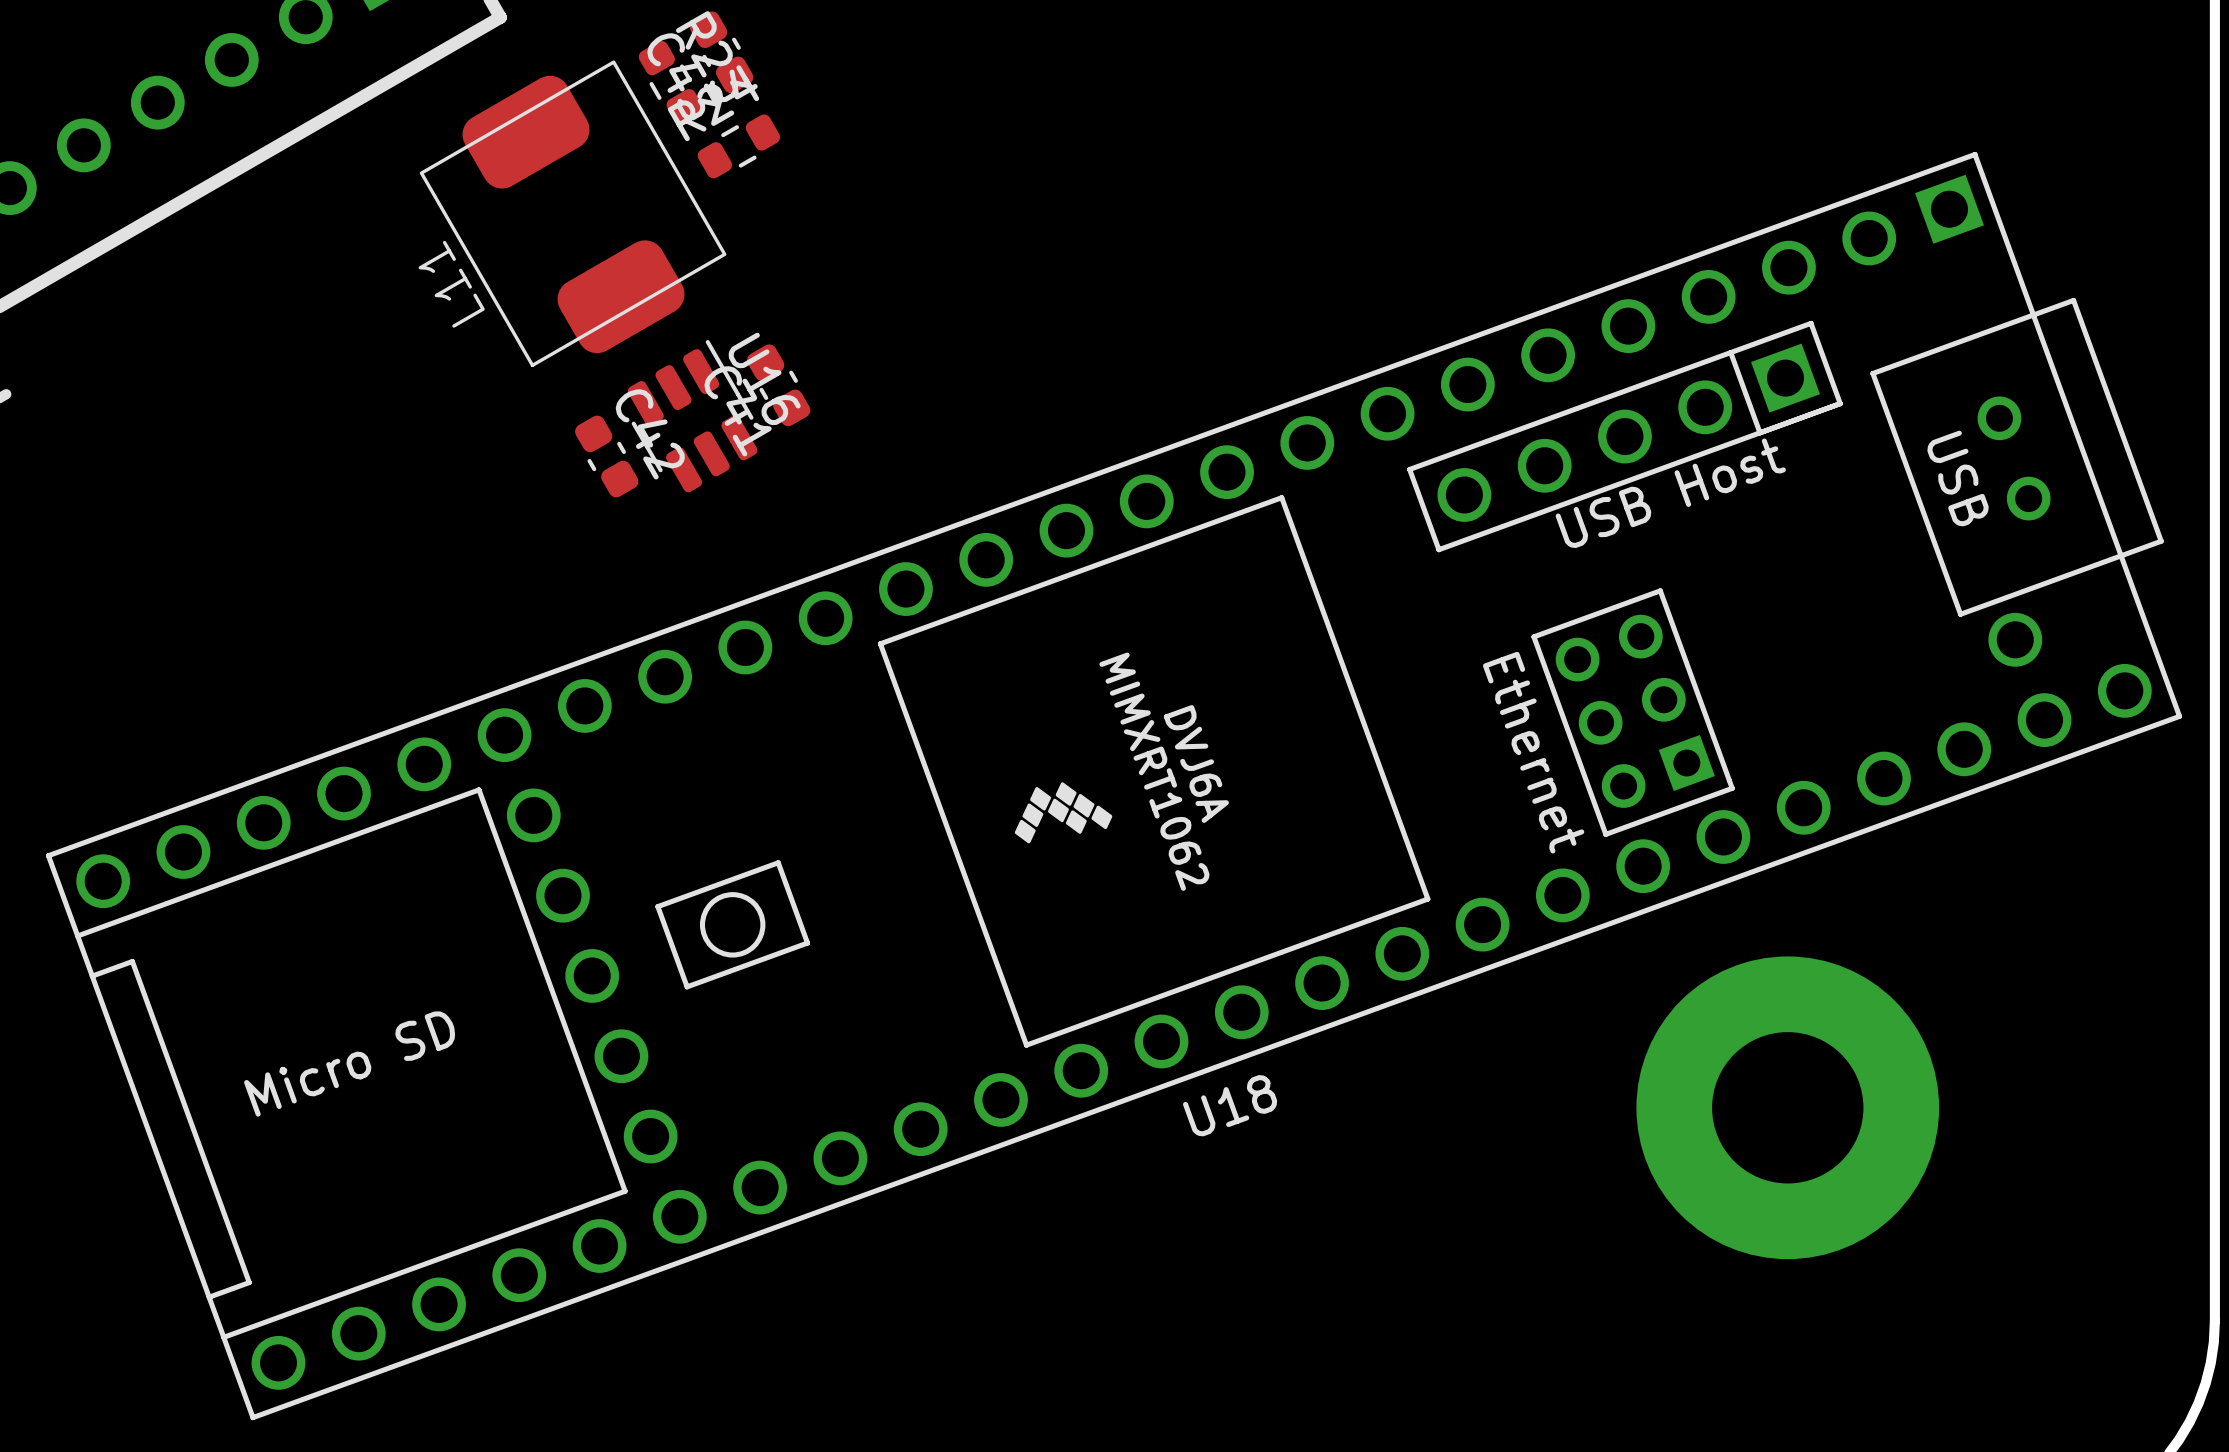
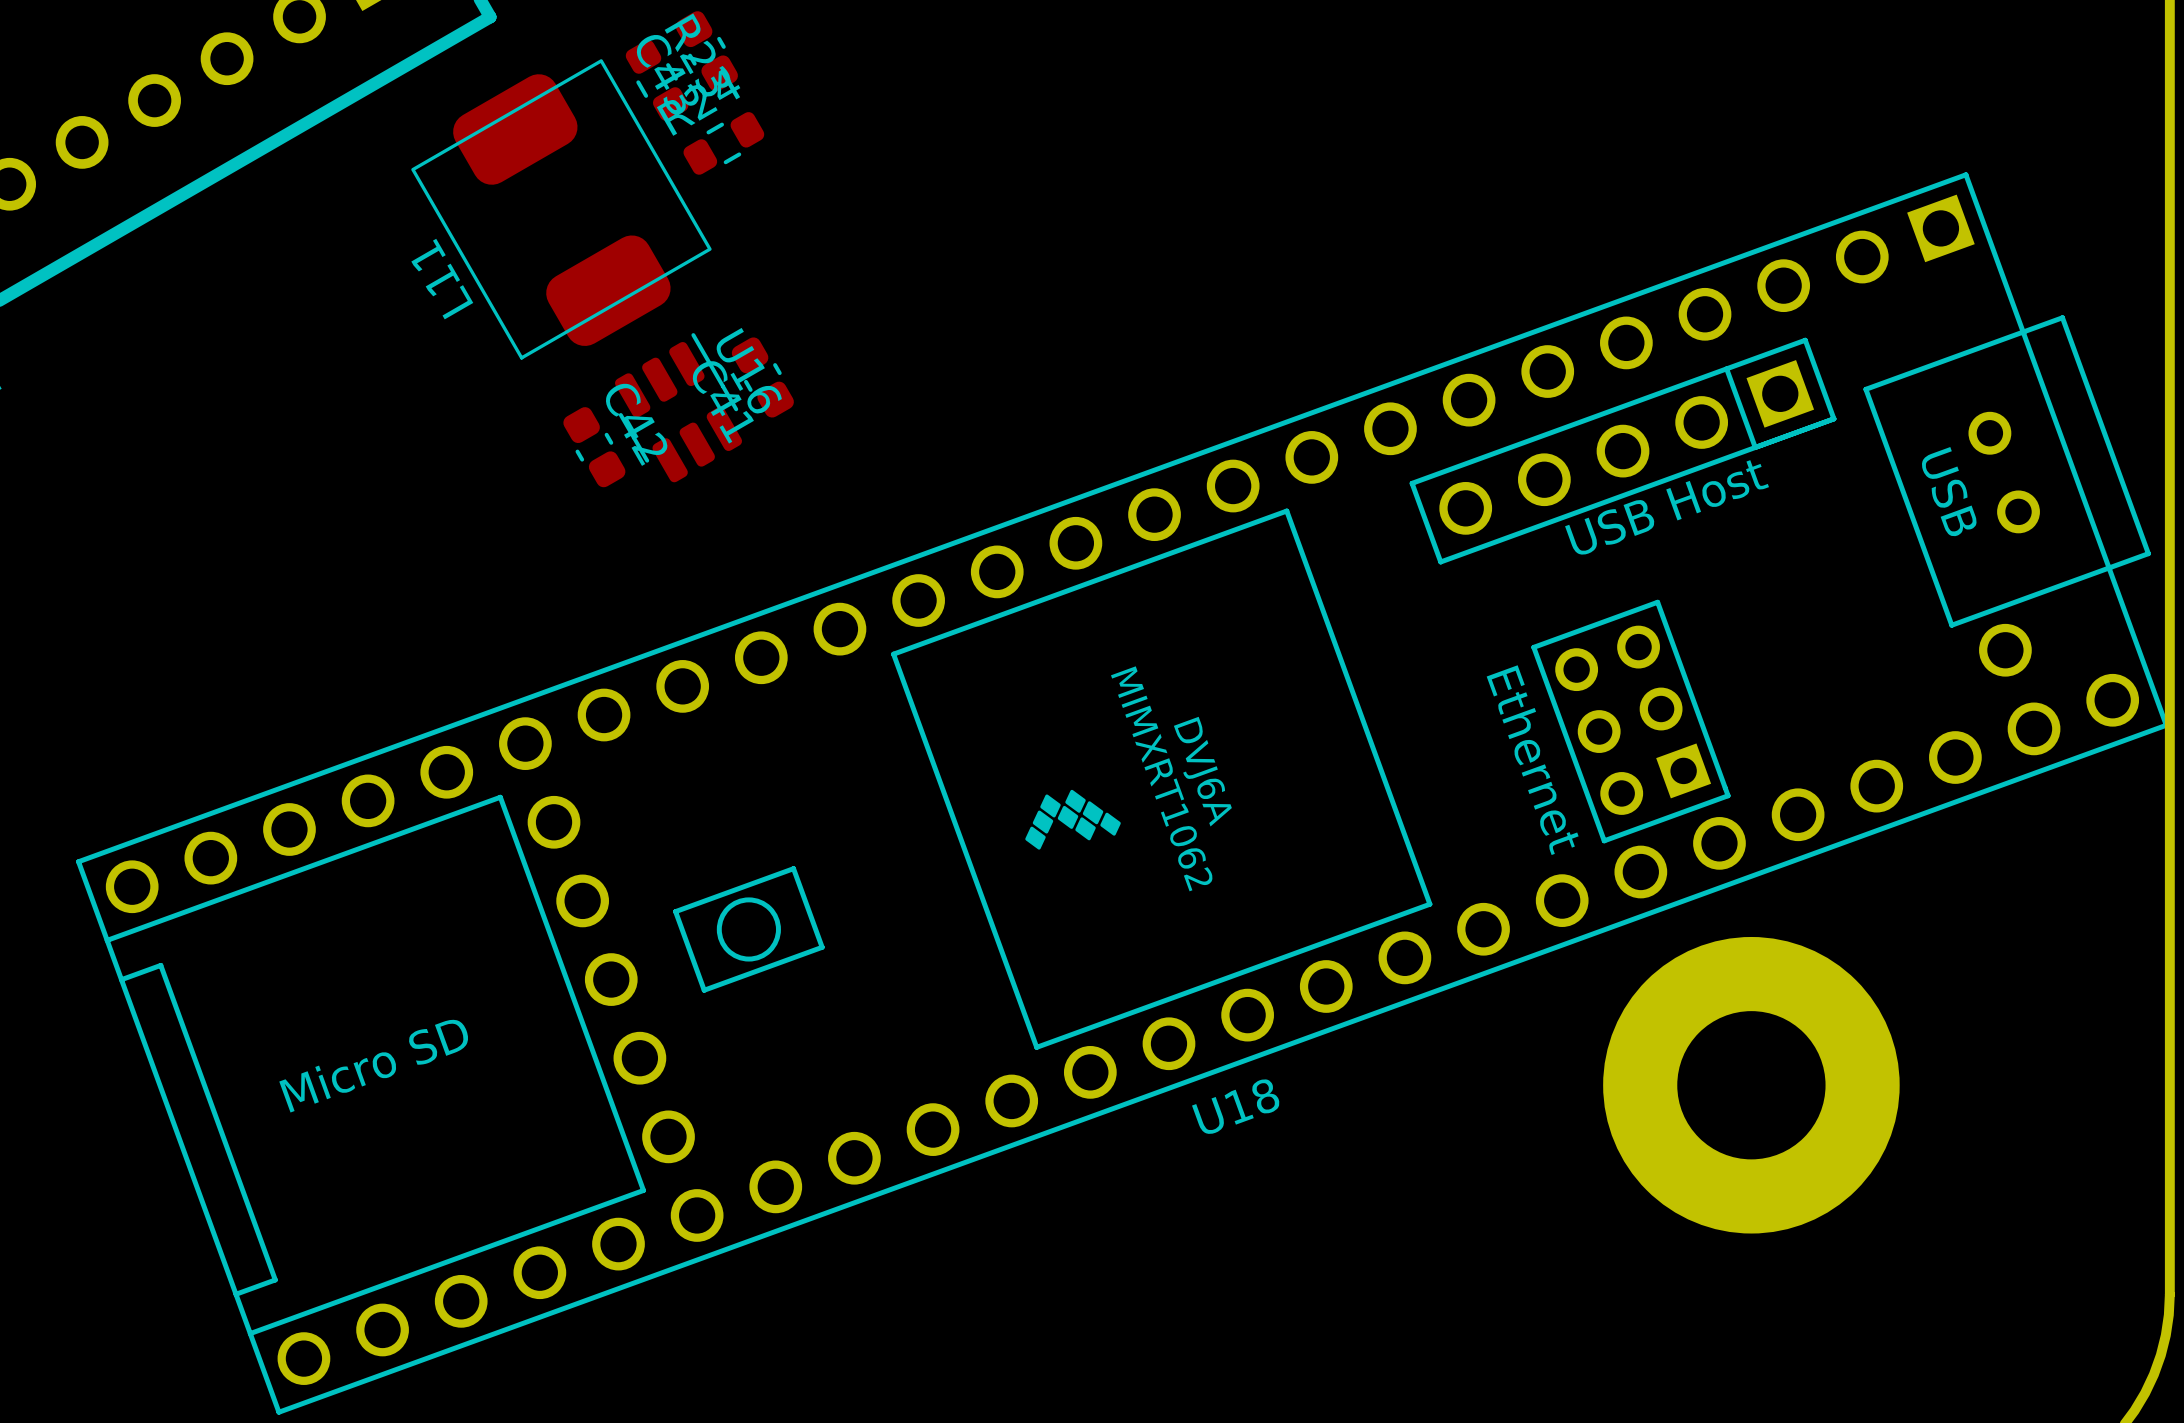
U18 position: (1114, 786) -> (1122, 793)

